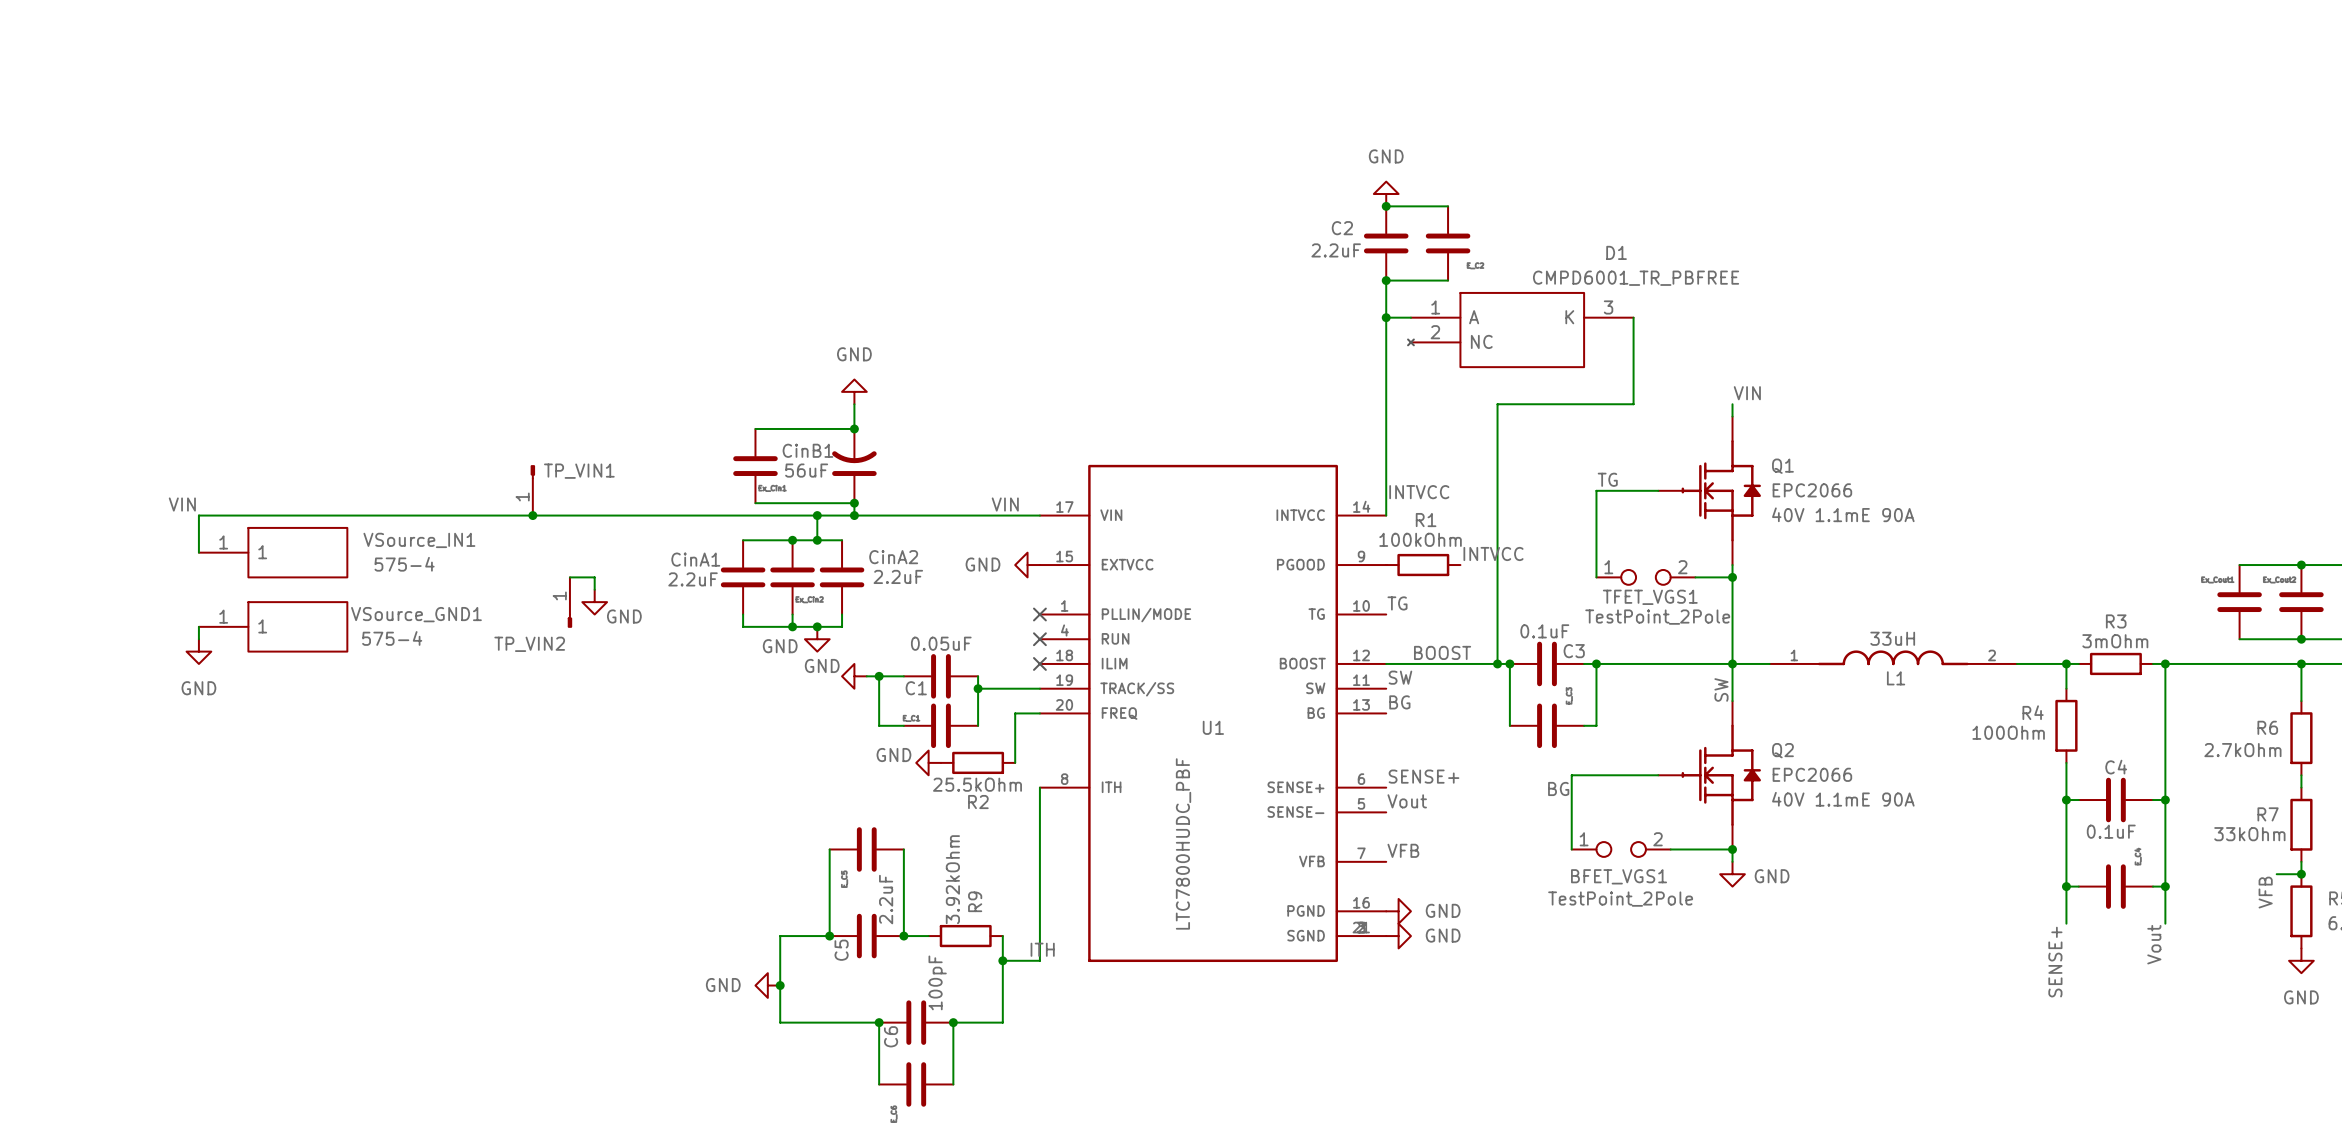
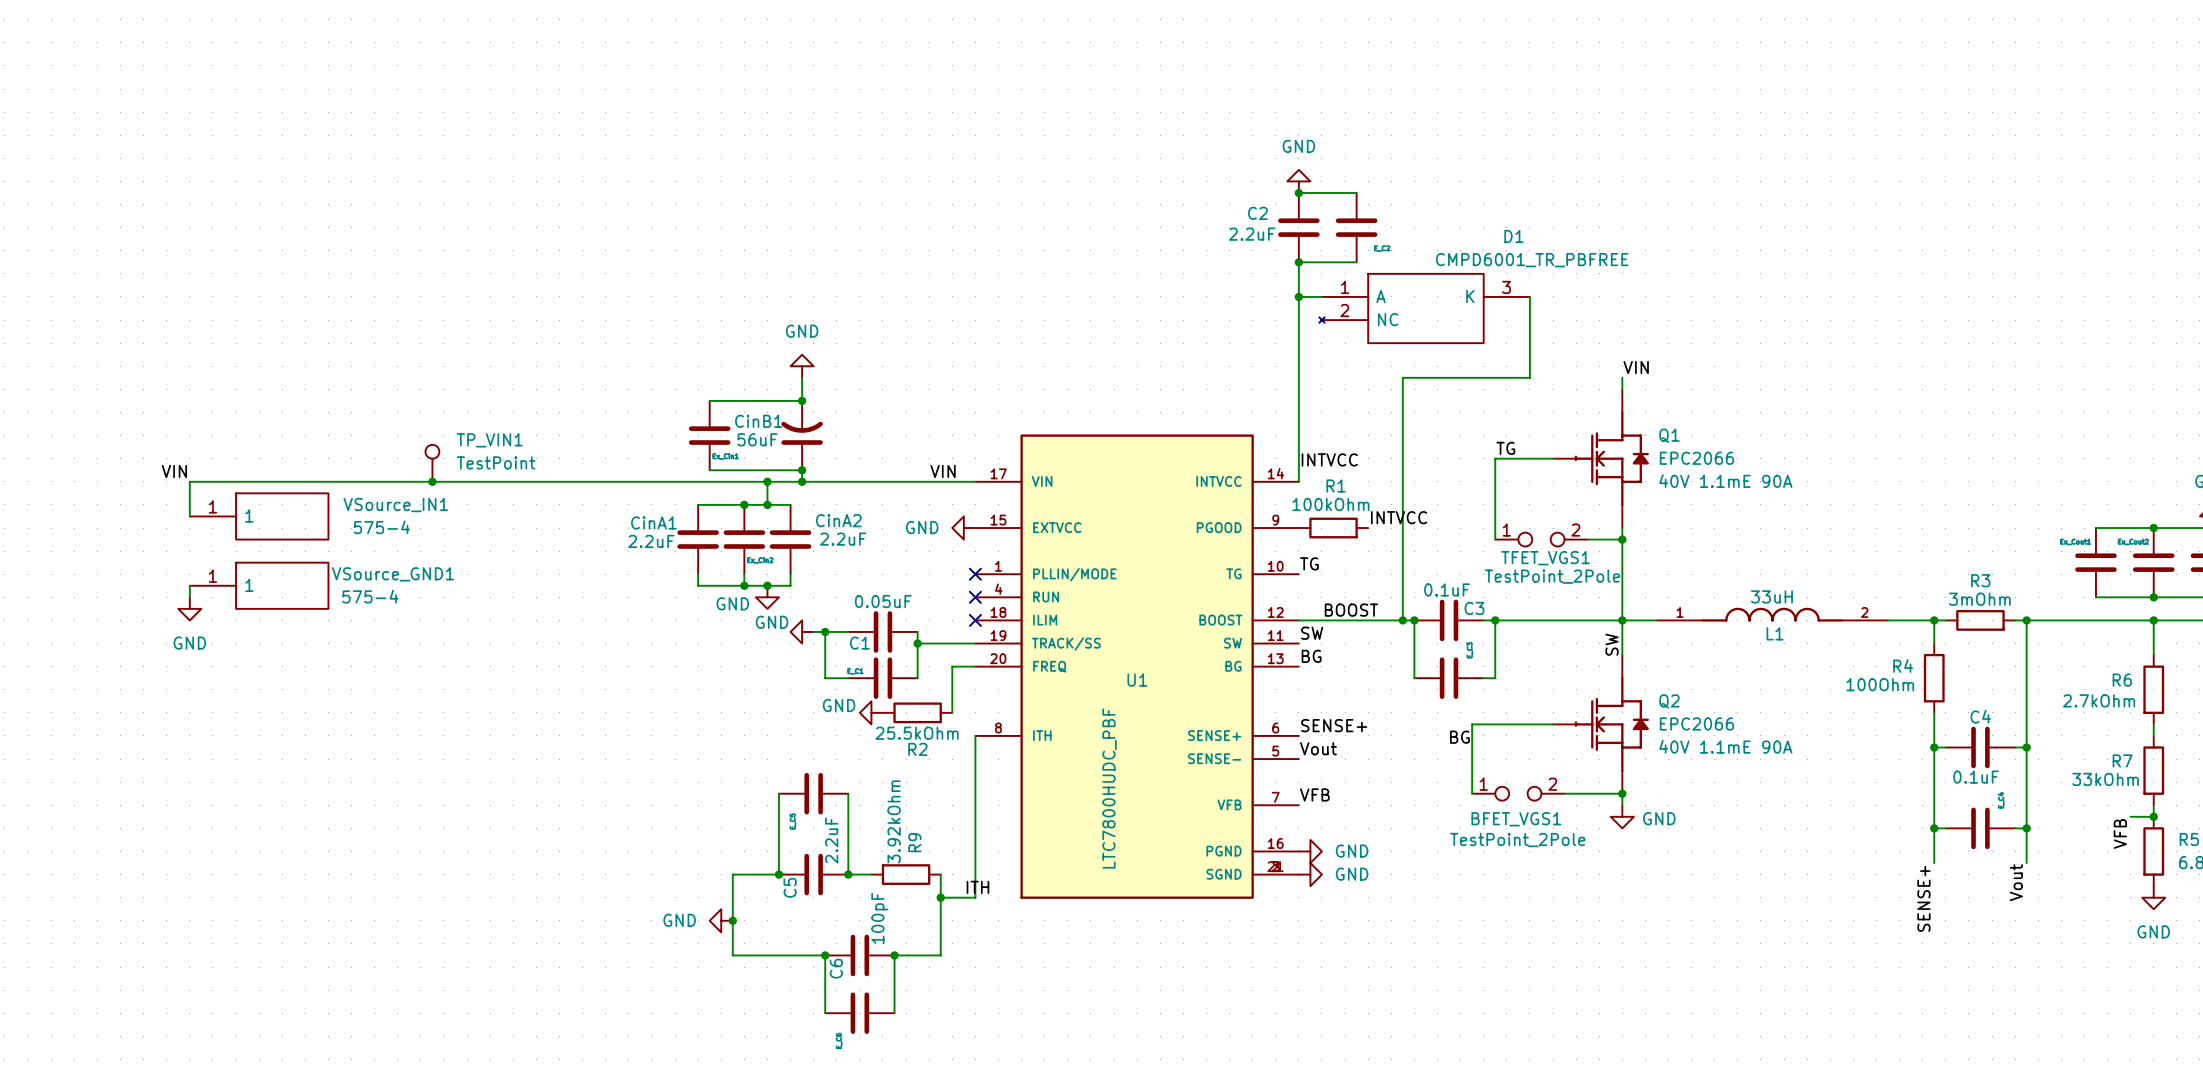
TP_VIN1 symbol: [530, 465, 535, 516] -> [425, 444, 440, 482]
TP_VIN1 value: none -> TestPoint (496, 462)
junction: none -> (432, 481)
junction: (532, 515) -> none
wire: (569, 577) (594, 577) (594, 589) -> none
TP_VIN2: (569, 602) -> none
power symbol: GND (594, 602) -> none

